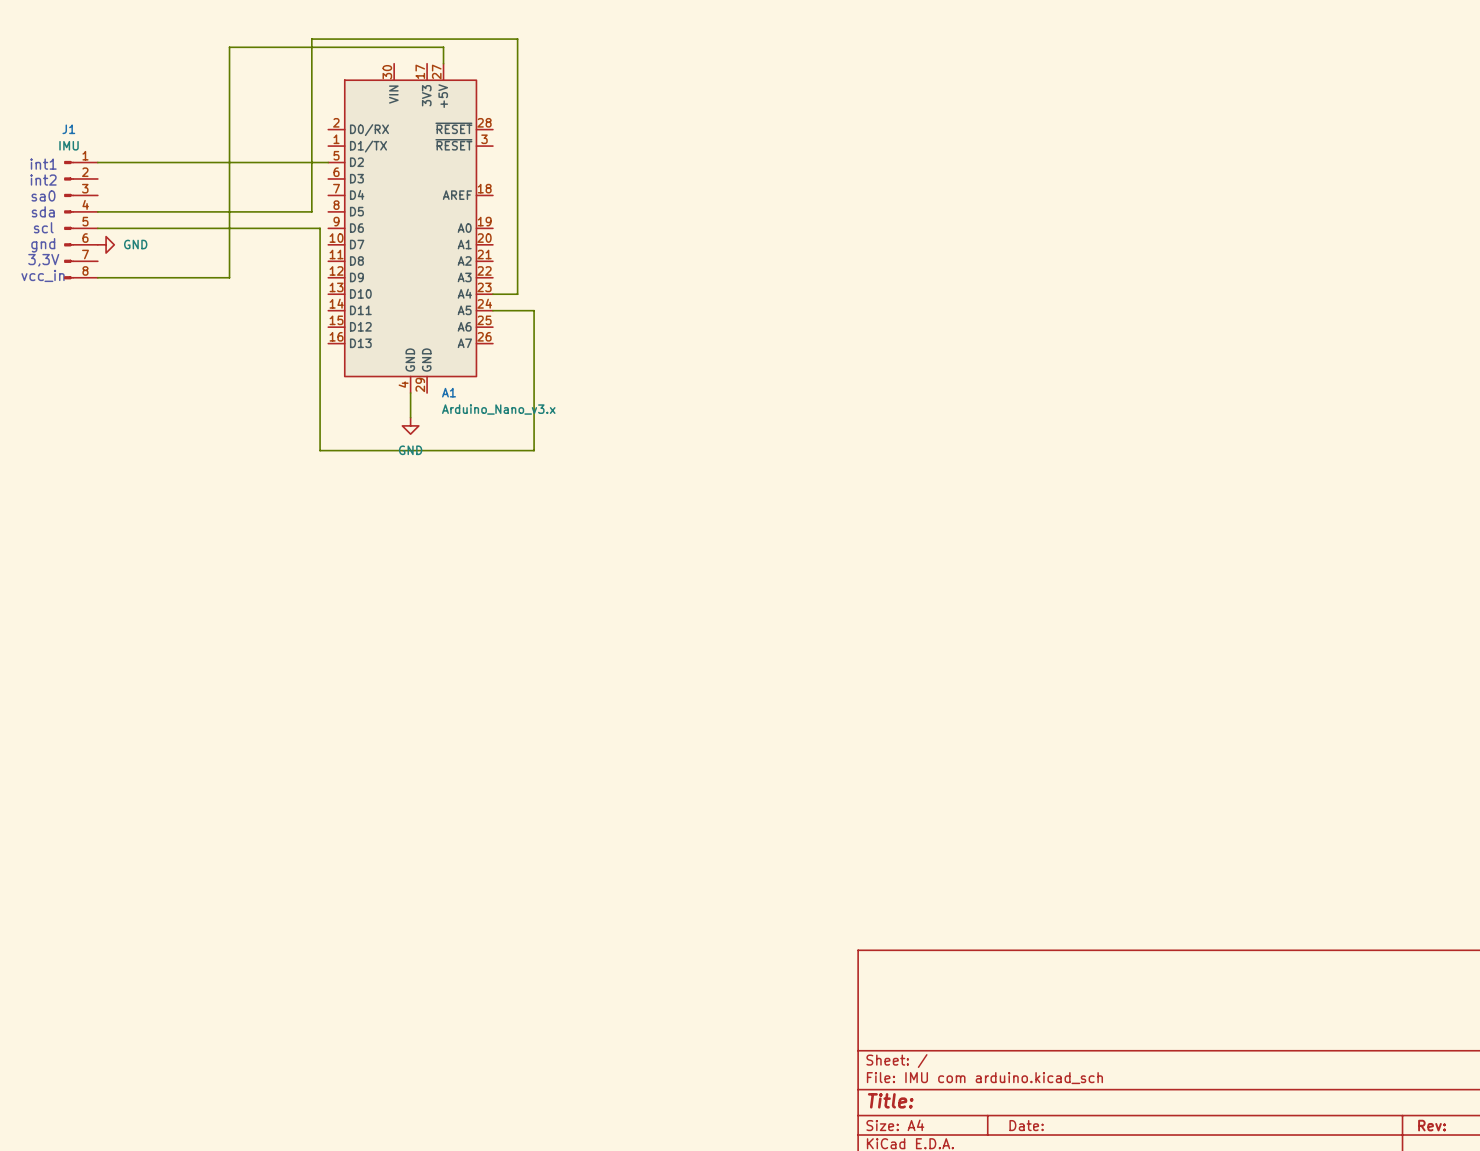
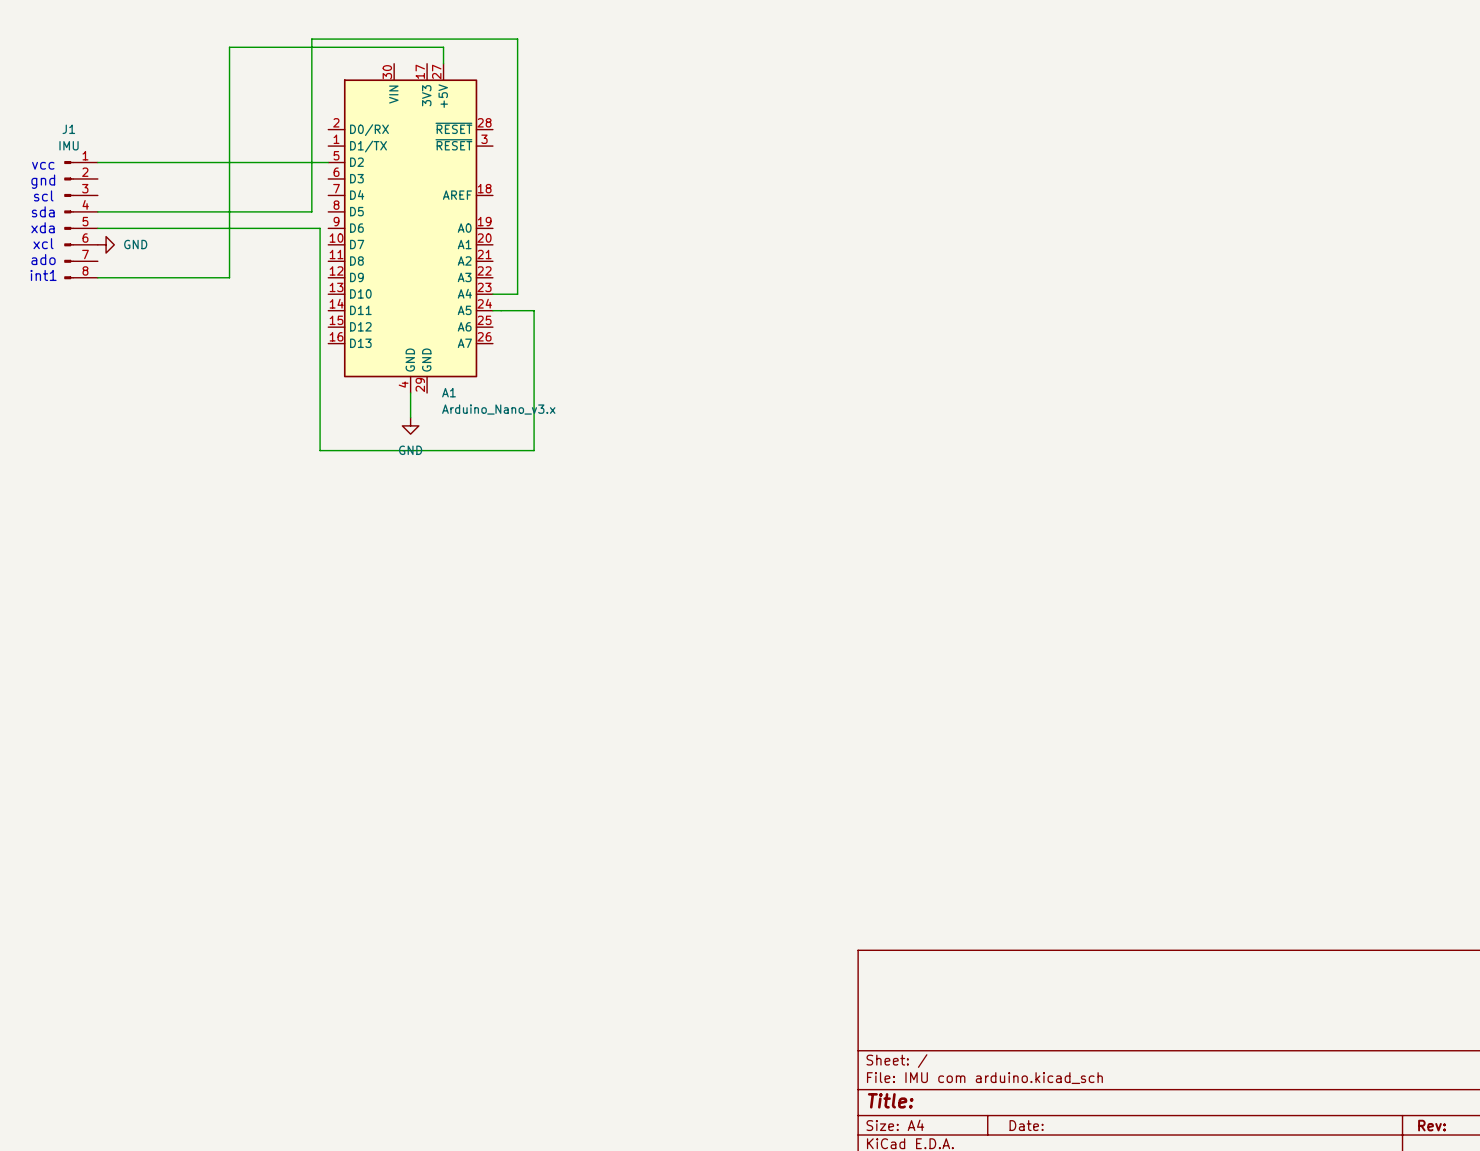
text: int1 (43, 164) -> vcc (43, 165)
text: int2 (43, 180) -> gnd (43, 181)
text: sa0 (43, 195) -> scl (43, 195)
text: scl (43, 227) -> xda (43, 227)
text: gnd (43, 245) -> xcl (43, 243)
text: 3,3V (43, 260) -> ado (43, 259)
text: vcc_in (43, 275) -> int1 (43, 275)

